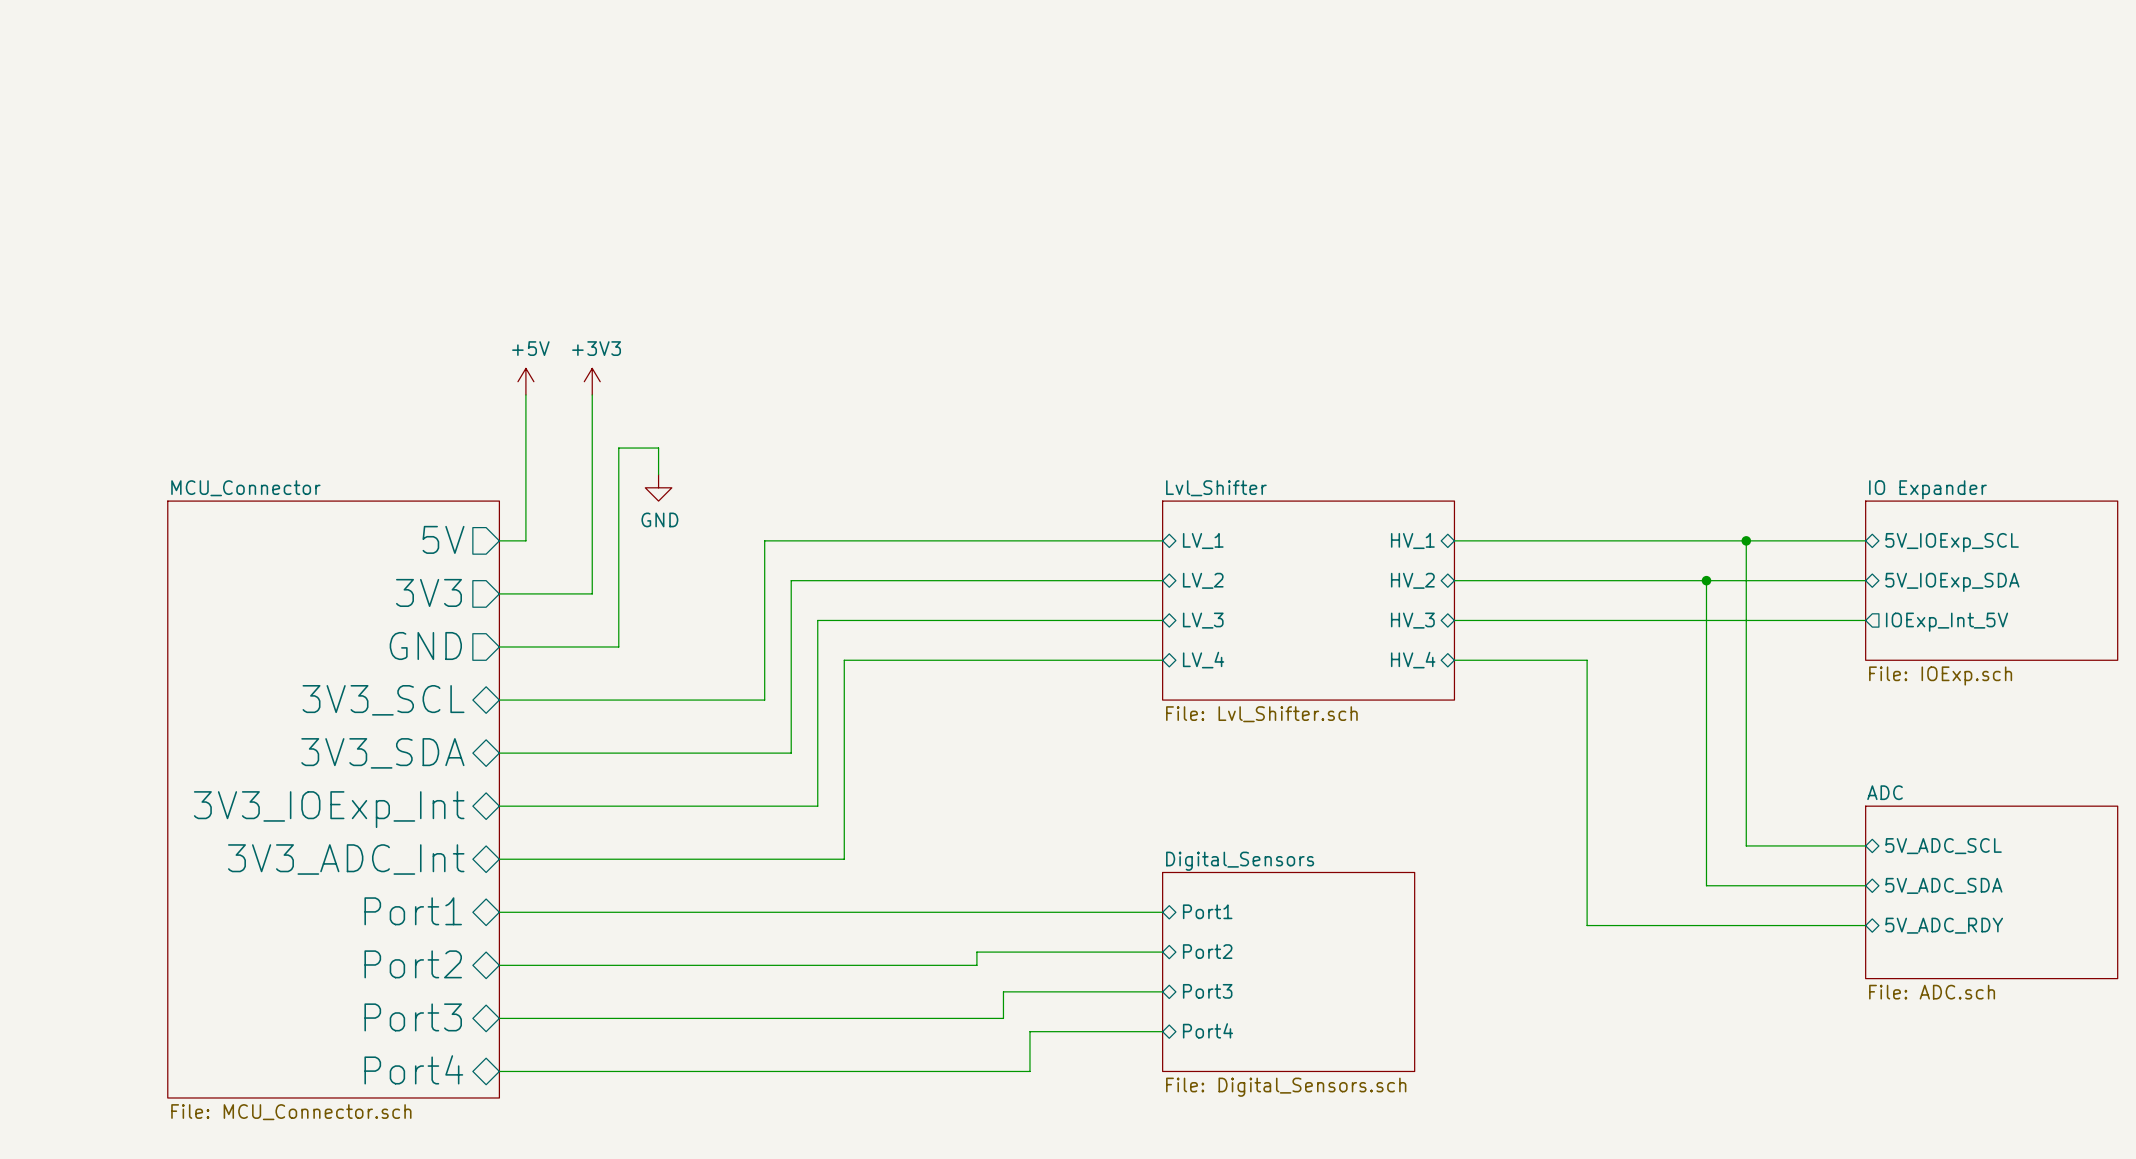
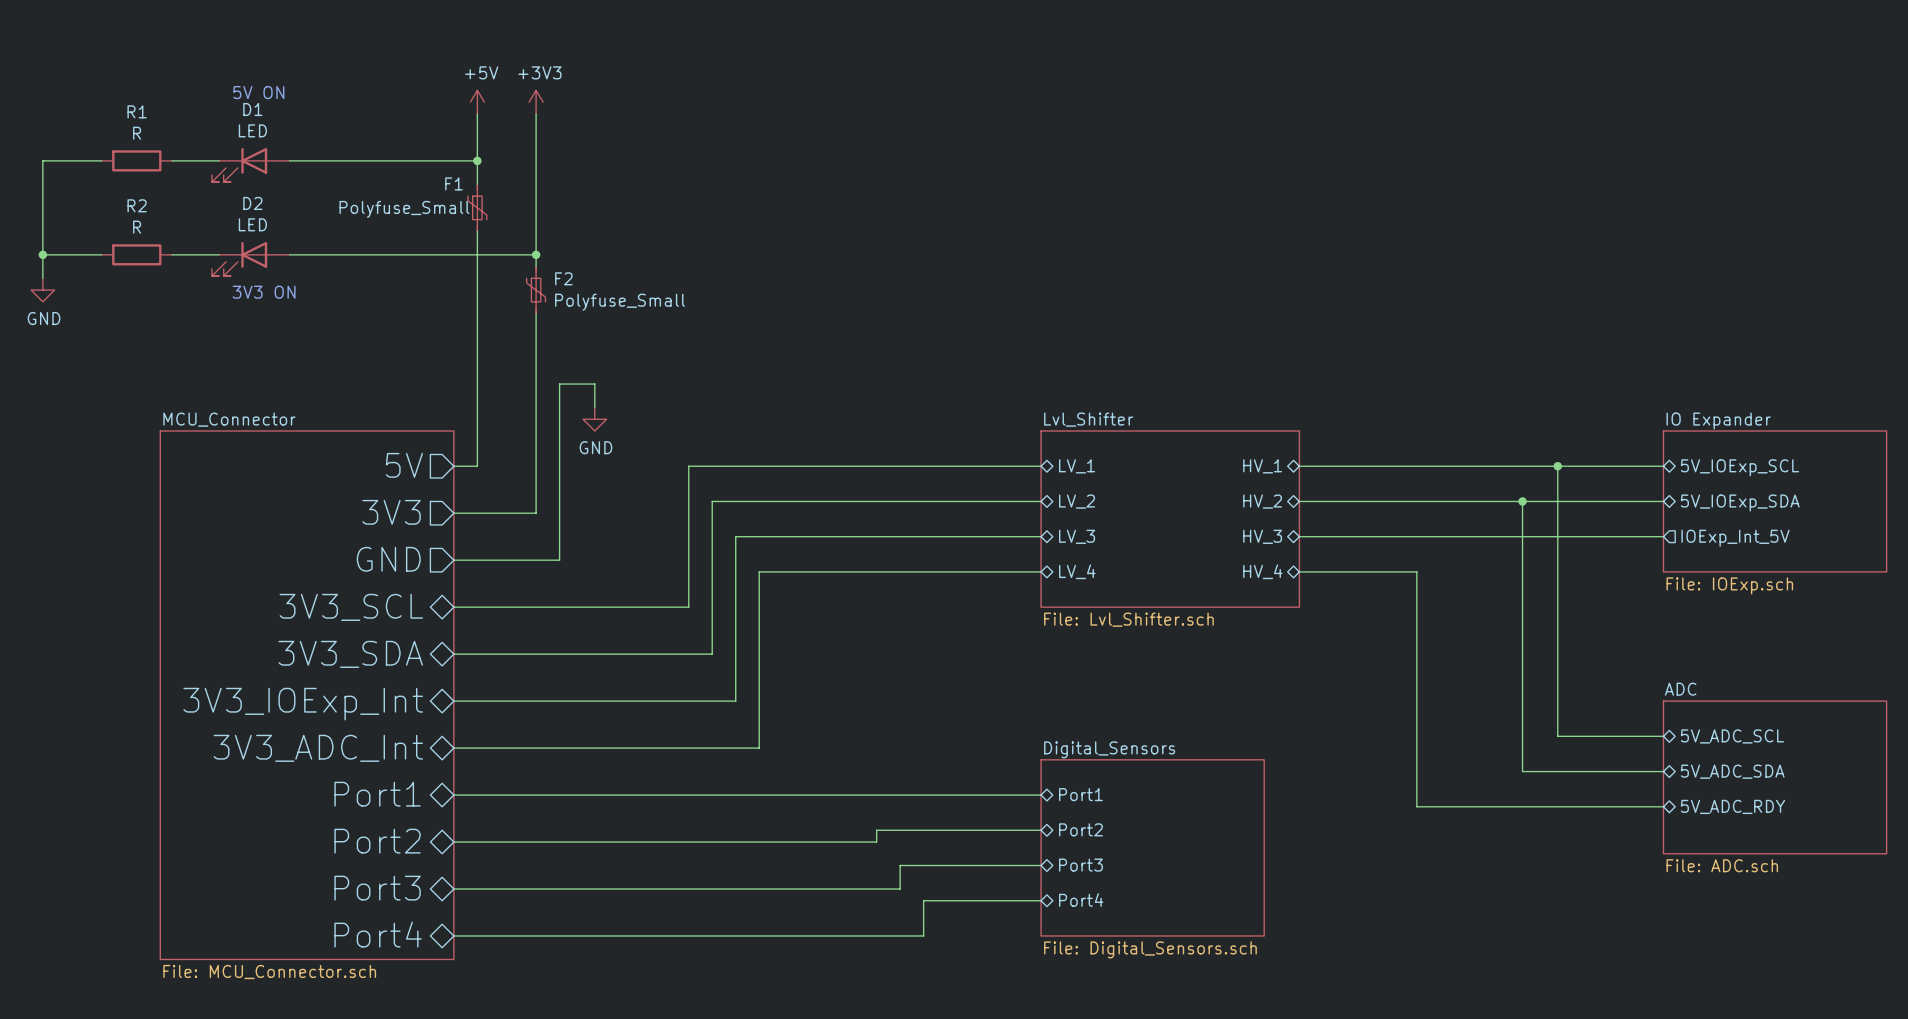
text: none -> 5V ON (258, 92)
wire: none -> (477, 113) (477, 184)
wire: none -> (536, 113) (536, 266)
wire: none -> (101, 160) (42, 160) (42, 278)
R1: none -> R (136, 160)
wire: none -> (172, 160) (219, 160)
wire: none -> (289, 160) (477, 160)
junction: none -> (477, 160)
D1: none -> LED (250, 165)
F1: none -> Polyfuse_Small (477, 207)
wire: none -> (477, 231) (477, 337)
wire: none -> (42, 254) (101, 254)
junction: none -> (42, 254)
R2: none -> R (136, 254)
wire: none -> (172, 254) (219, 254)
wire: none -> (289, 254) (536, 254)
junction: none -> (536, 254)
D2: none -> LED (250, 258)
power symbol: none -> GND (42, 290)
F2: none -> Polyfuse_Small (536, 290)
text: none -> 3V3 ON (264, 292)
power symbol position: +5V (525, 381) -> +5V (477, 102)
power symbol position: +3V3 (592, 381) -> +3V3 (536, 102)

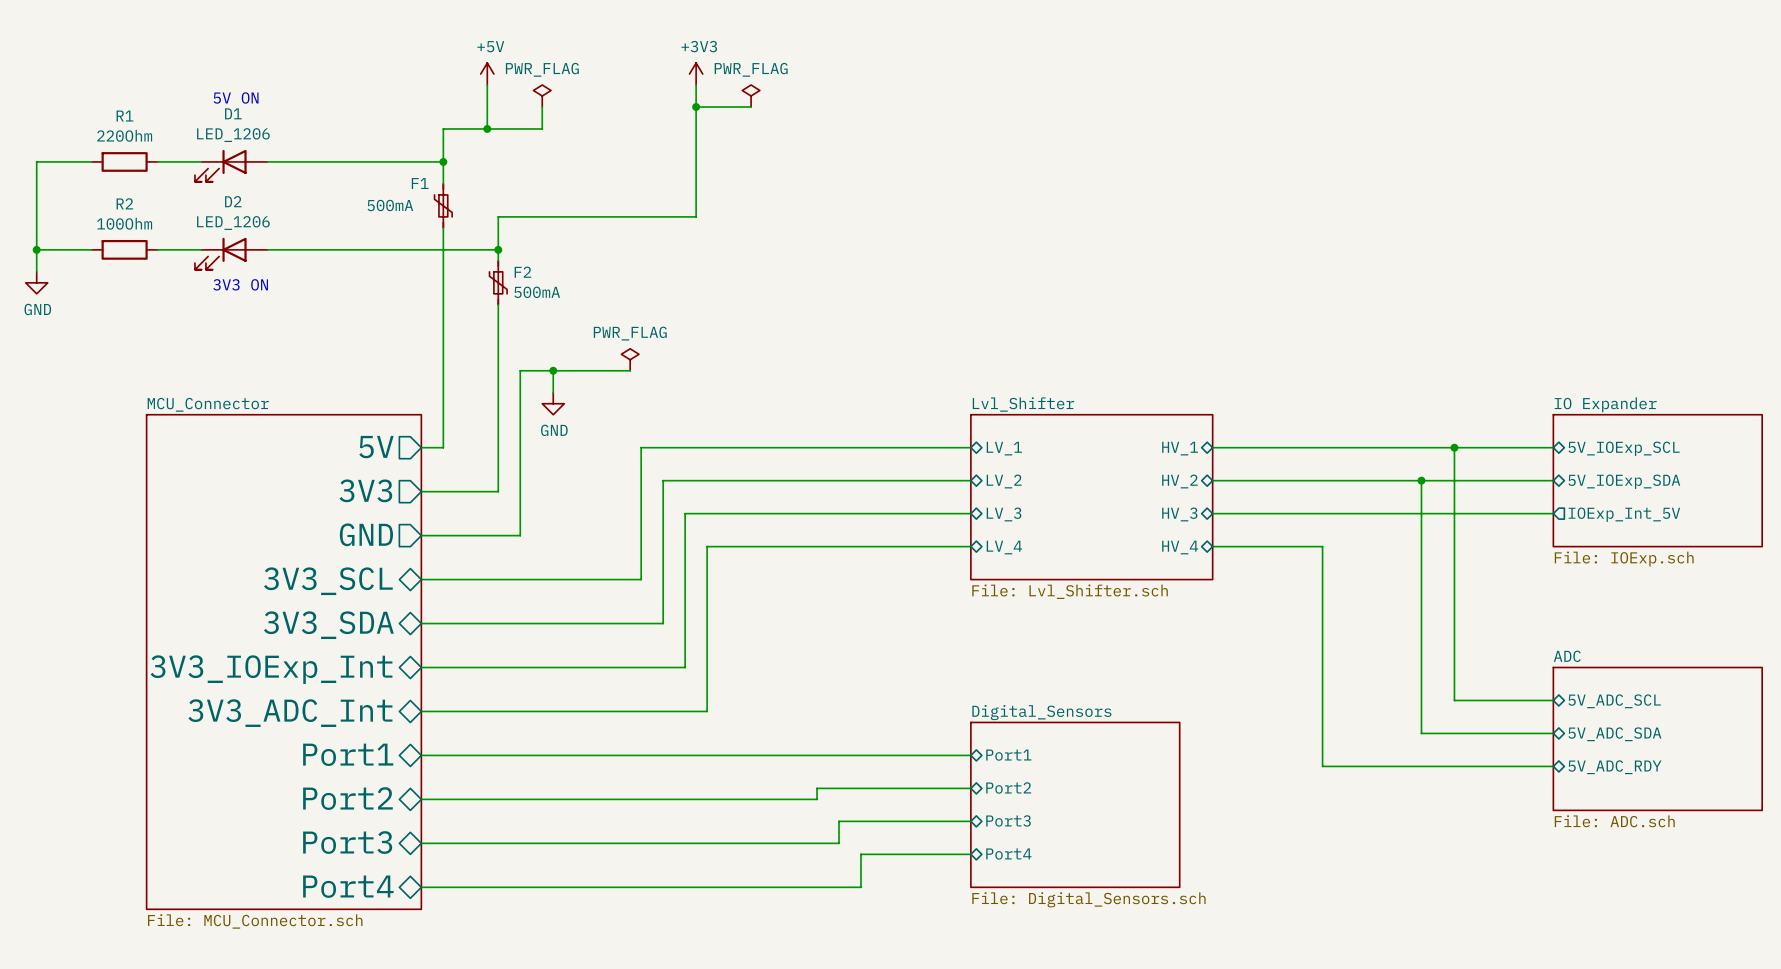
wire: none -> (487, 85) (487, 128)
power symbol: none -> PWR_FLAG (542, 96)
power symbol: none -> PWR_FLAG (751, 96)
power symbol position: +5V (477, 102) -> +5V (487, 74)
power symbol position: +3V3 (536, 102) -> +3V3 (696, 74)
wire: none -> (696, 107) (751, 107)
junction: none -> (696, 107)
wire: (477, 113) (477, 125) -> (542, 107) (542, 128) (443, 128)
wire: (536, 113) (536, 219) -> (696, 85) (696, 216) (498, 216)
junction: none -> (487, 128)
D1 value: LED (252, 130) -> LED_1206 (233, 135)
R1 value: R (137, 133) -> 220Ohm (124, 135)
F1 value: Polyfuse_Small (404, 209) -> 500mA (390, 205)
D2 value: LED (252, 224) -> LED_1206 (233, 223)
R2 value: R (137, 227) -> 100Ohm (124, 223)
F2 value: Polyfuse_Small (620, 302) -> 500mA (537, 292)
power symbol: none -> PWR_FLAG (630, 359)
wire: none -> (553, 370) (630, 370)
junction: none -> (553, 370)

